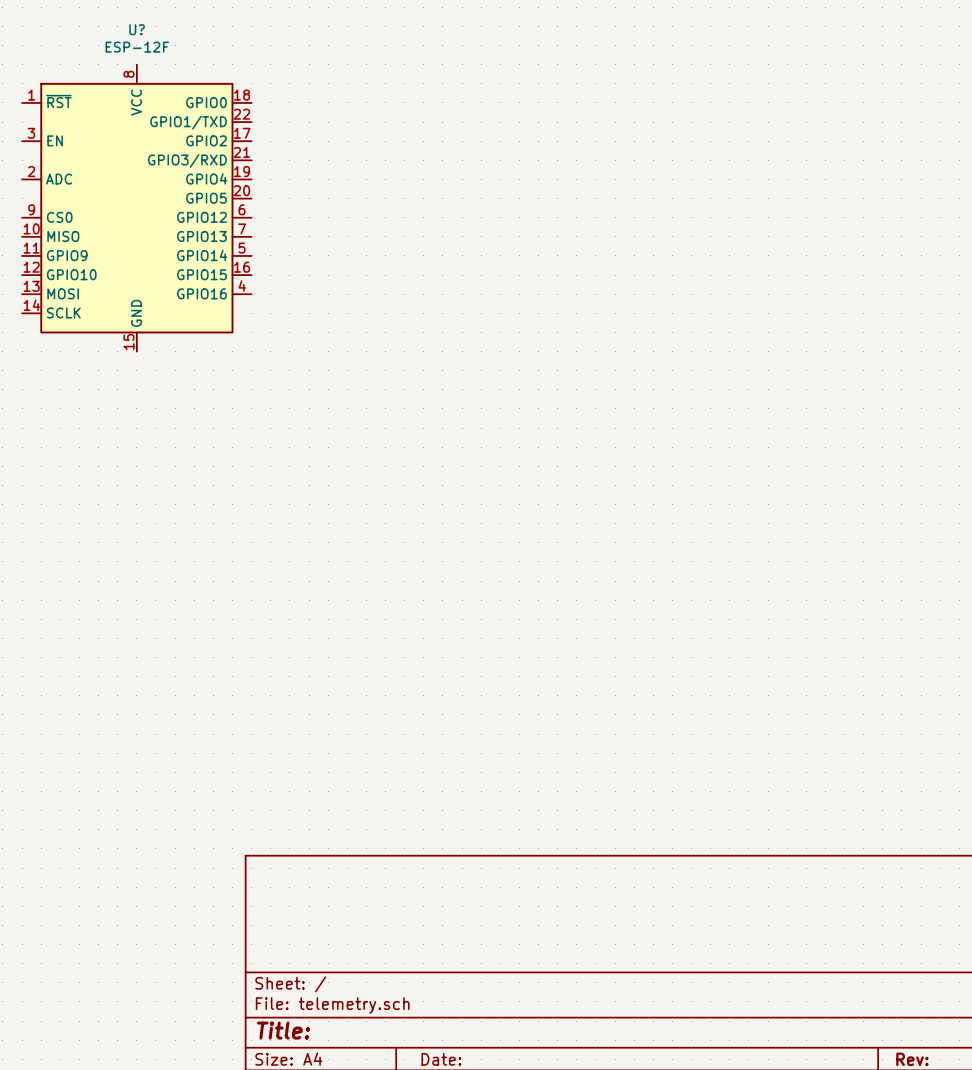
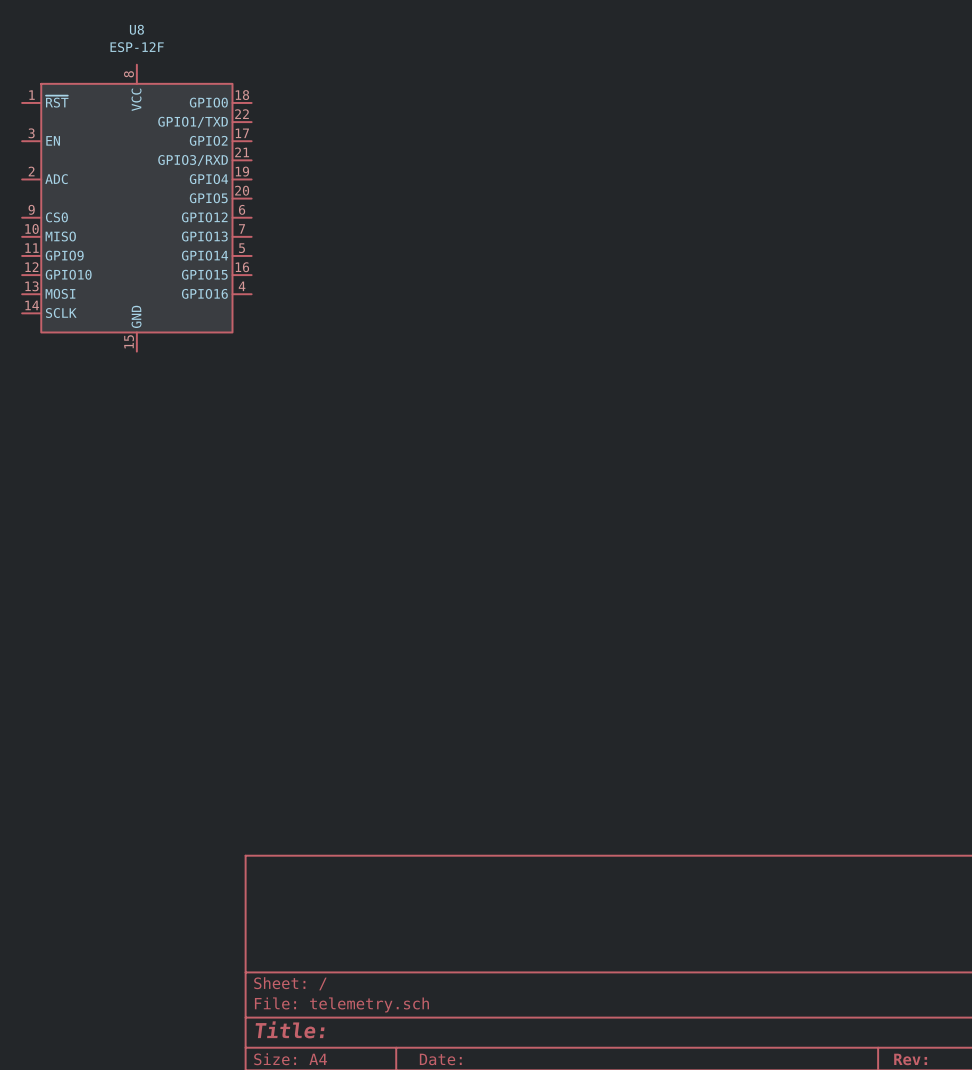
U? name: U? (137, 29) -> U8 (136, 29)

